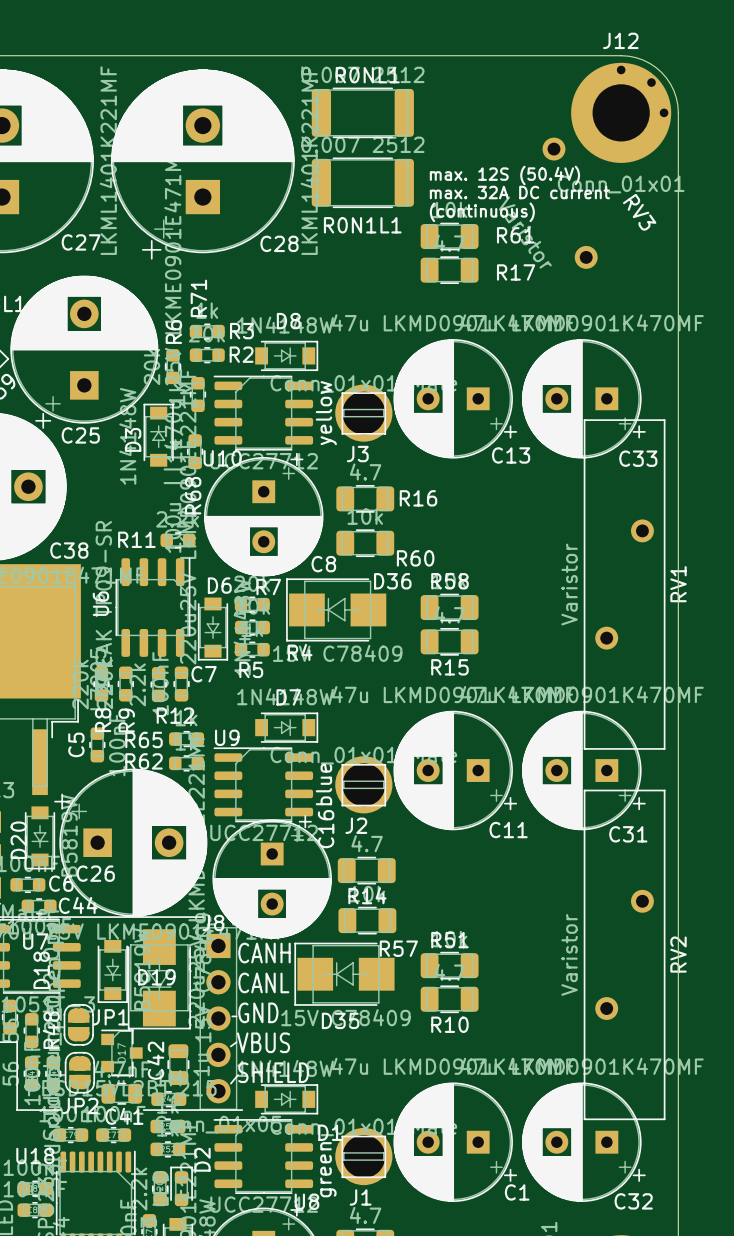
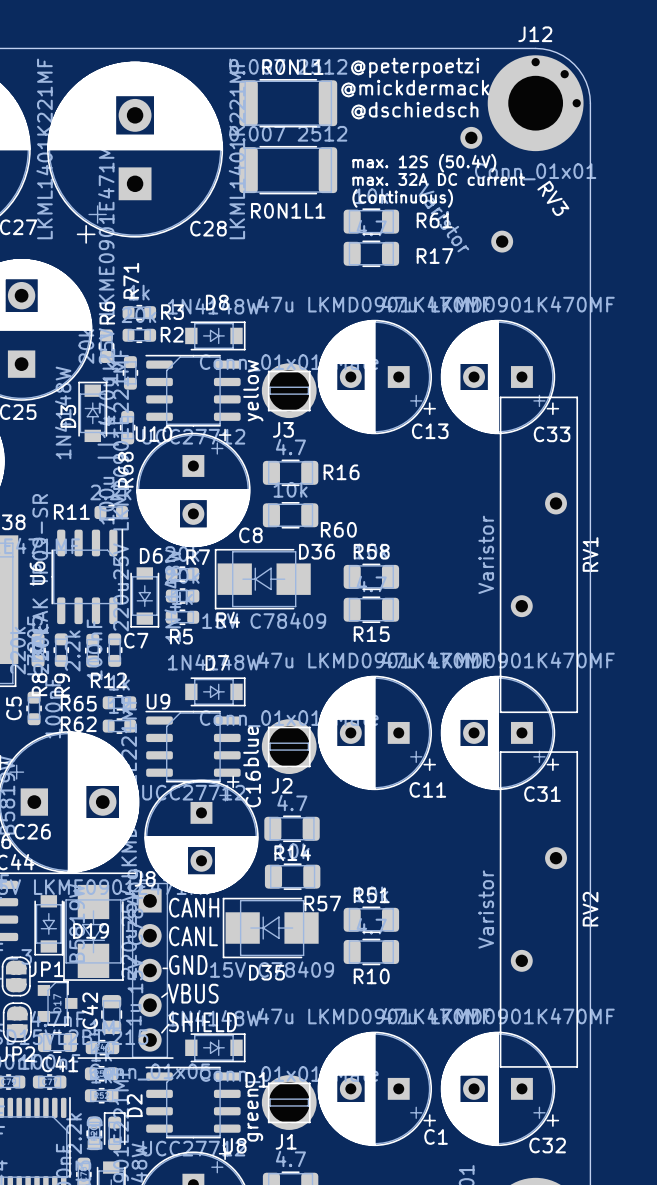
text: none -> @peterpoetzi (415, 67)
text: none -> @mickdermack (415, 88)
text: none -> @dschiedsch (414, 110)

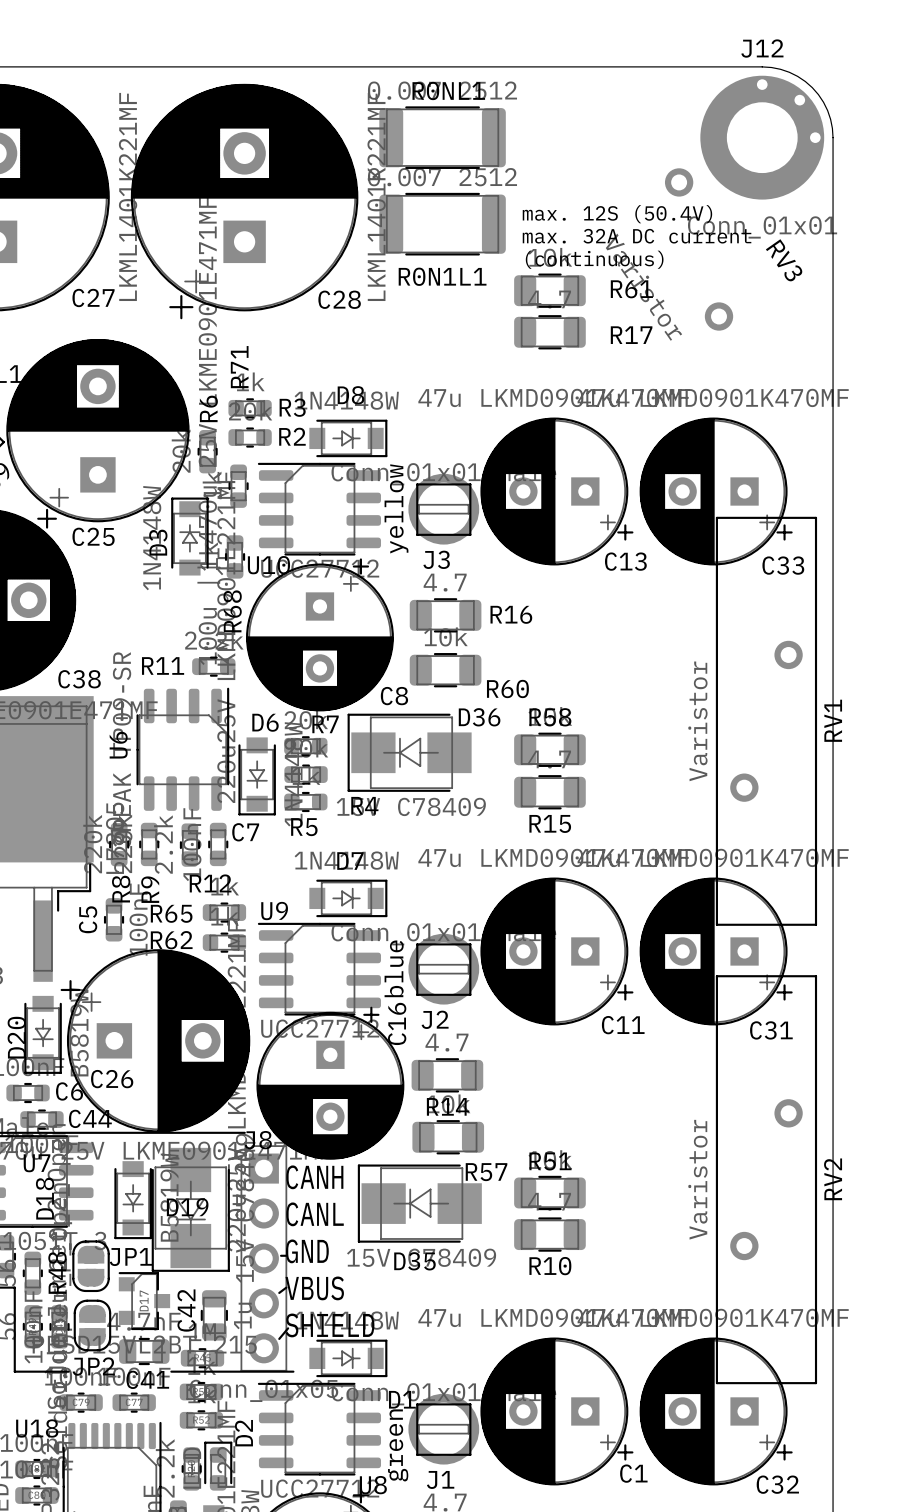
text: @peterpoetzi (415, 67) -> none
text: @mickdermack (415, 88) -> none
text: @dschiedsch (414, 110) -> none

